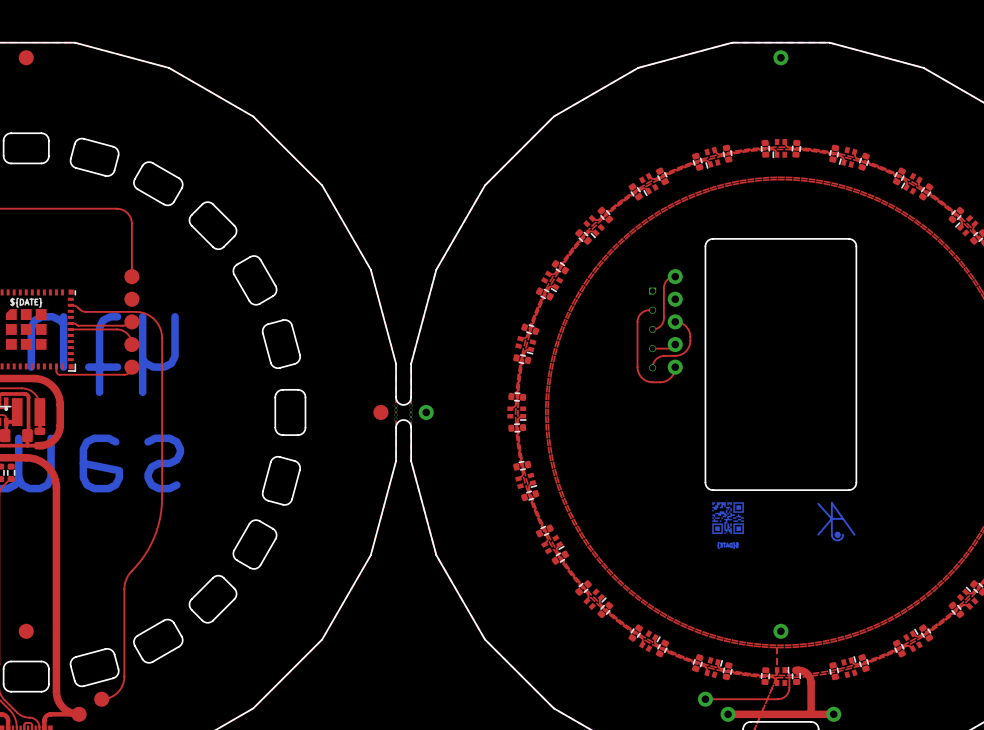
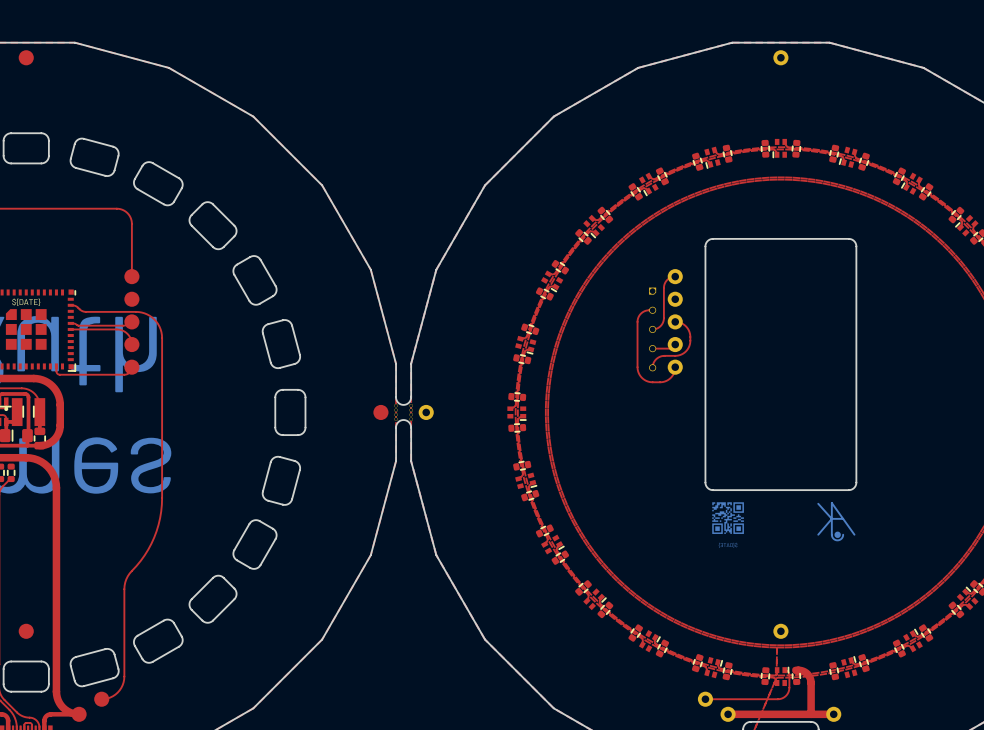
drawing: none -> [22, 405, 35, 418]
drawing: none -> [12, 429, 13, 442]
drawing: none -> [34, 435, 46, 442]

